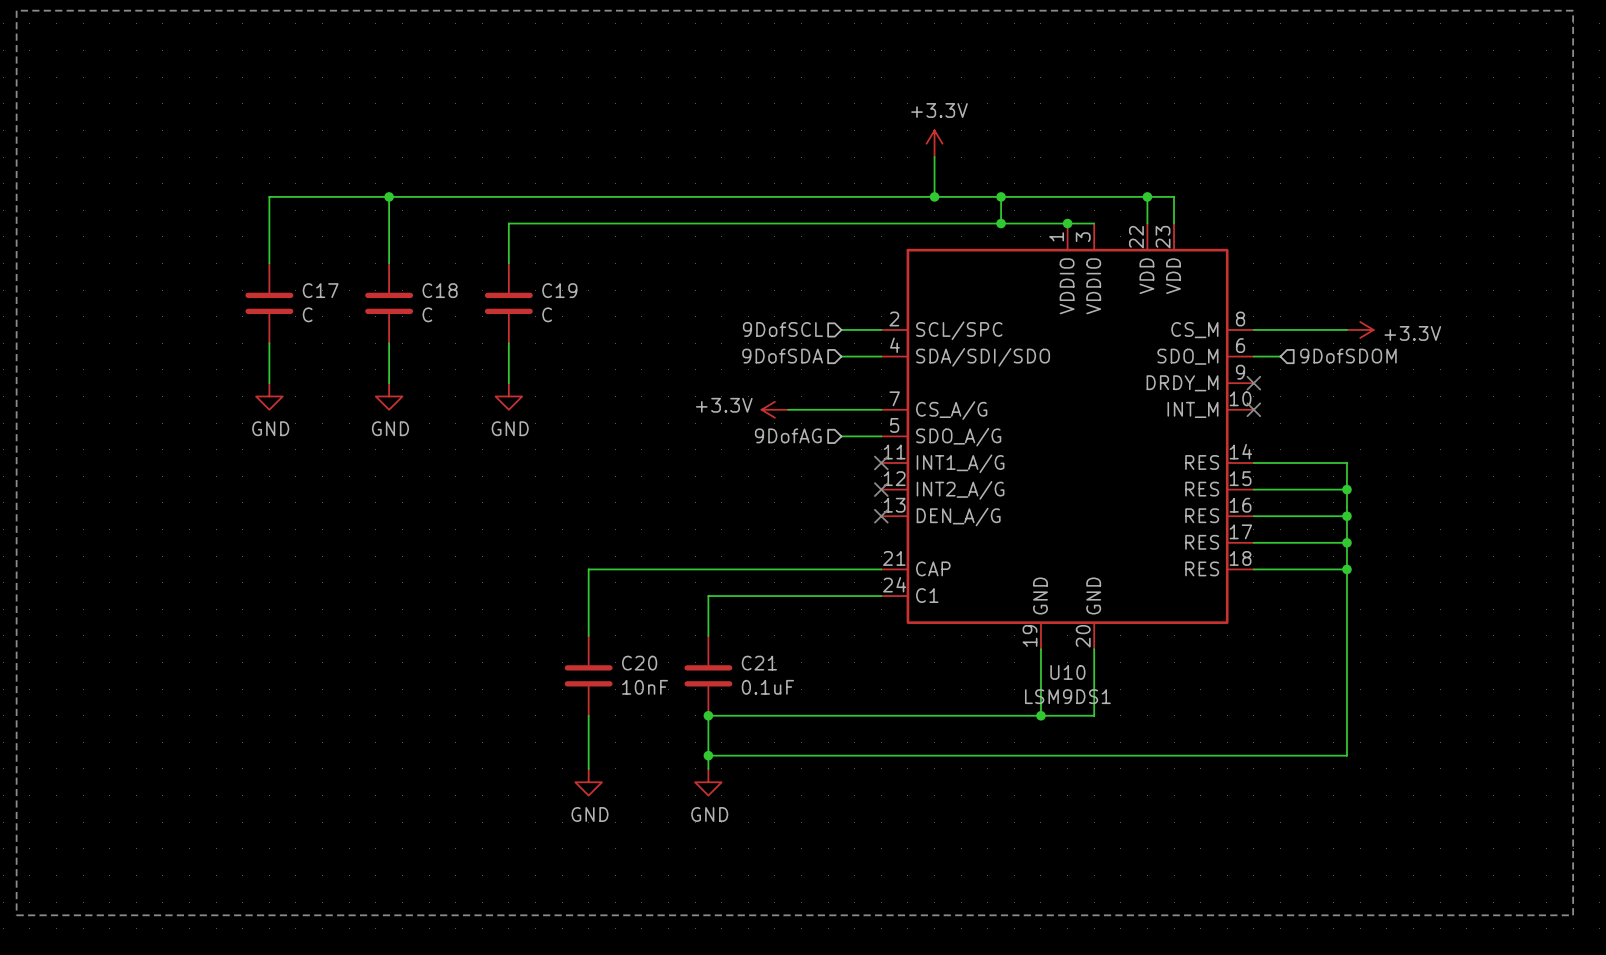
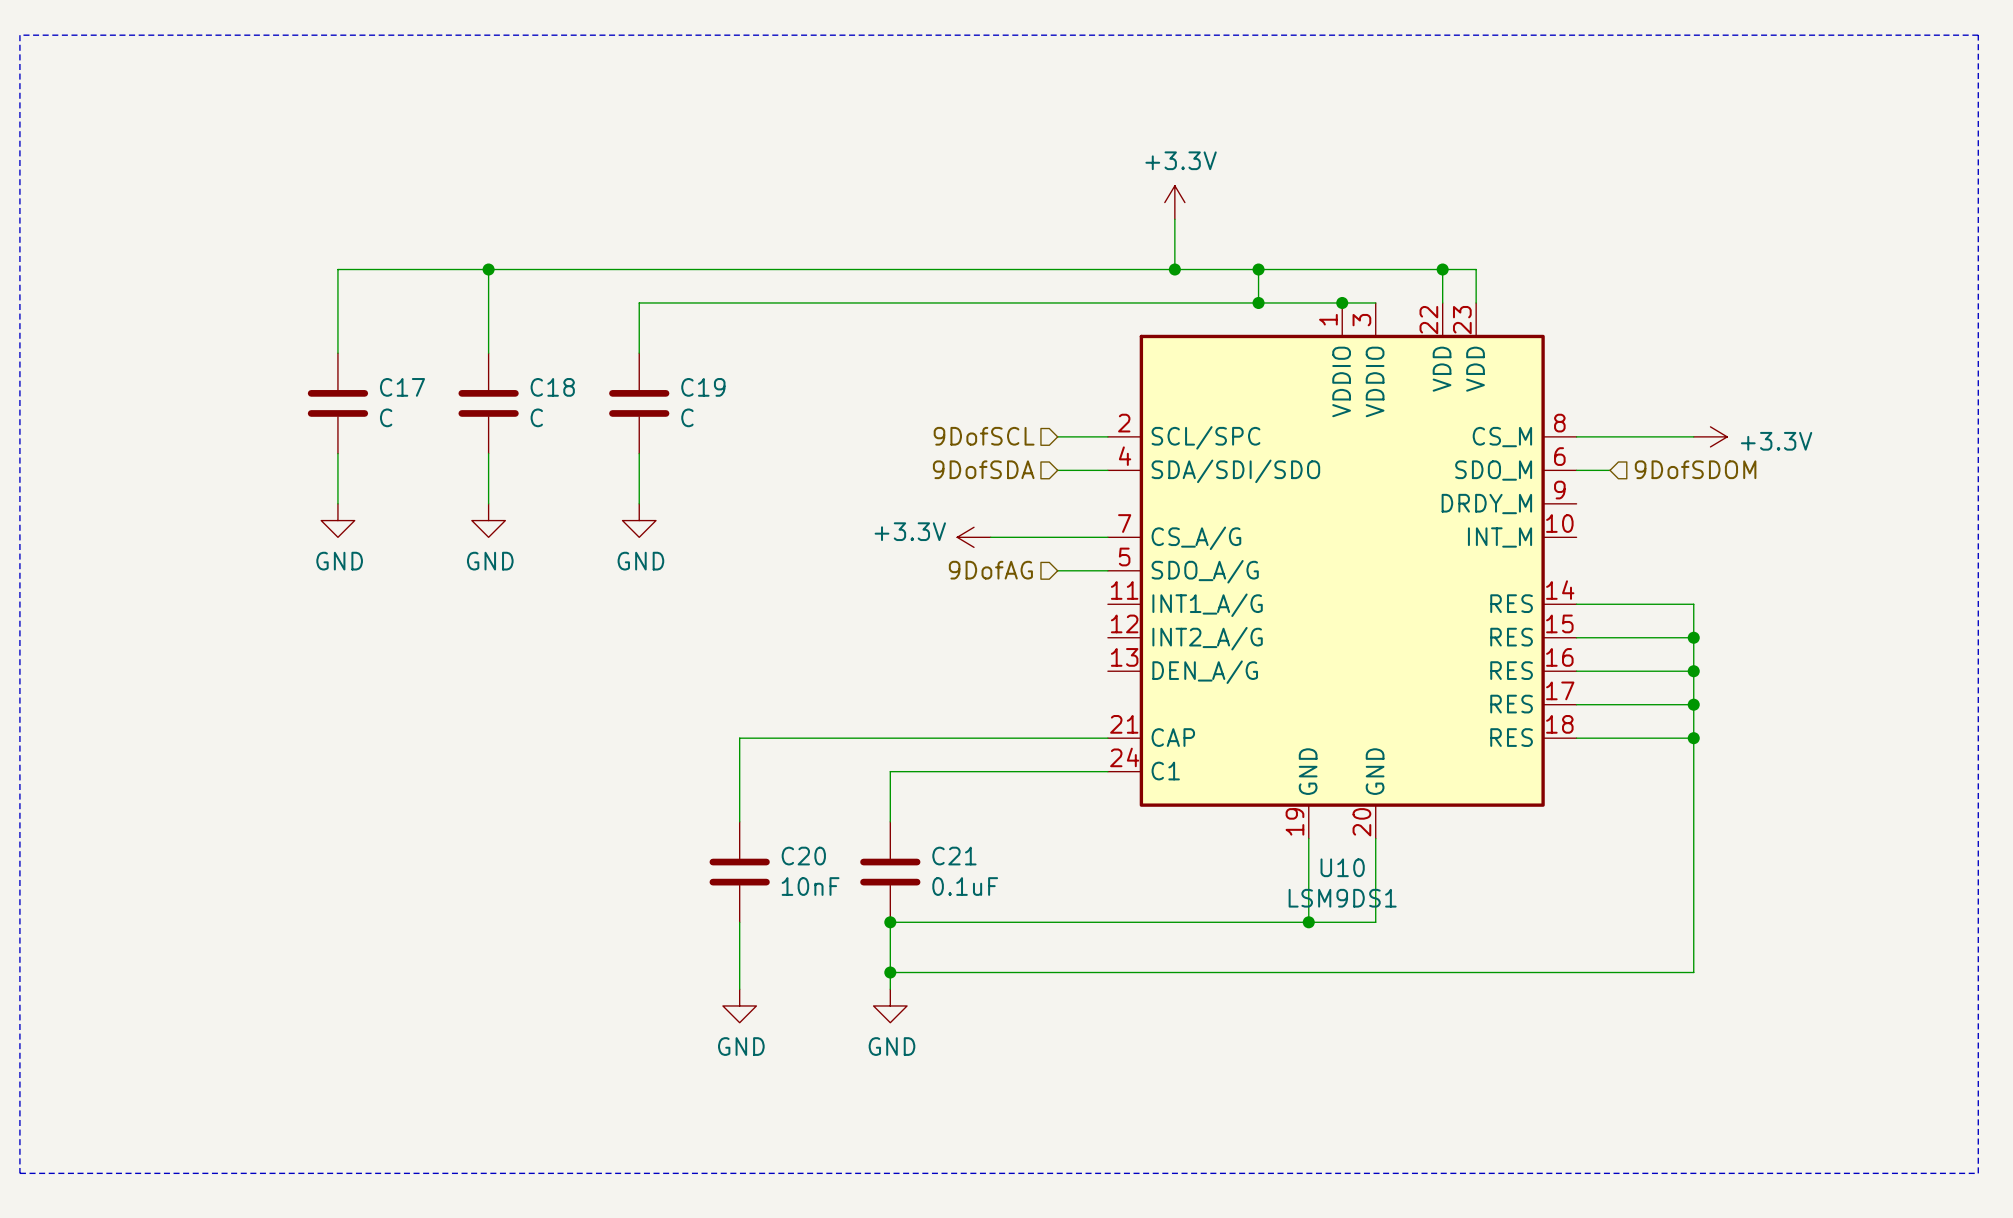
no-connect mark: (1253, 383) -> none
no-connect mark: (1253, 409) -> none
no-connect mark: (881, 463) -> none
no-connect mark: (881, 489) -> none
no-connect mark: (881, 516) -> none

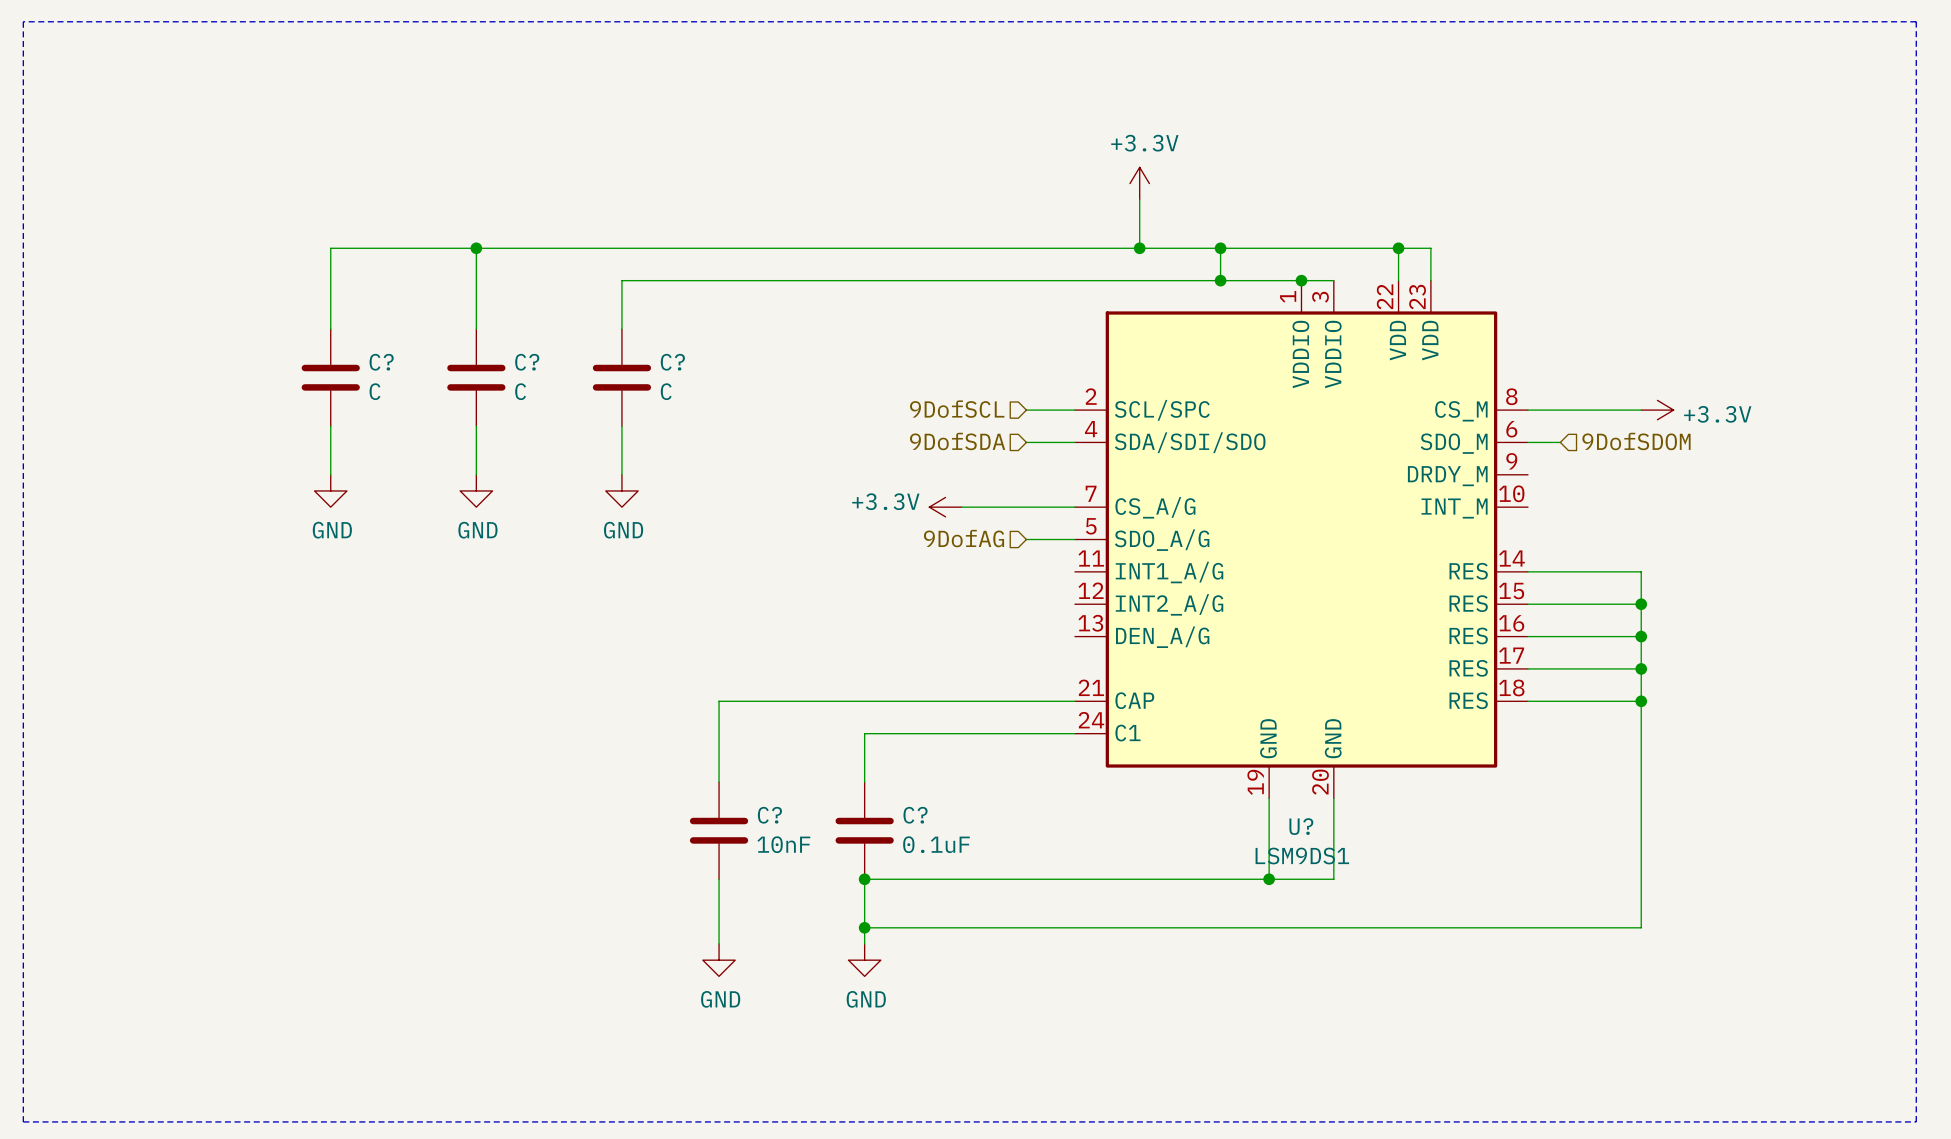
C17 name: C17 (402, 387) -> C? (381, 362)
C18 name: C18 (552, 387) -> C? (527, 362)
C19 name: C19 (703, 387) -> C? (672, 362)
C20 name: C20 (803, 856) -> C? (769, 815)
C21 name: C21 (954, 856) -> C? (915, 815)
U10 name: U10 (1342, 867) -> U? (1301, 826)

